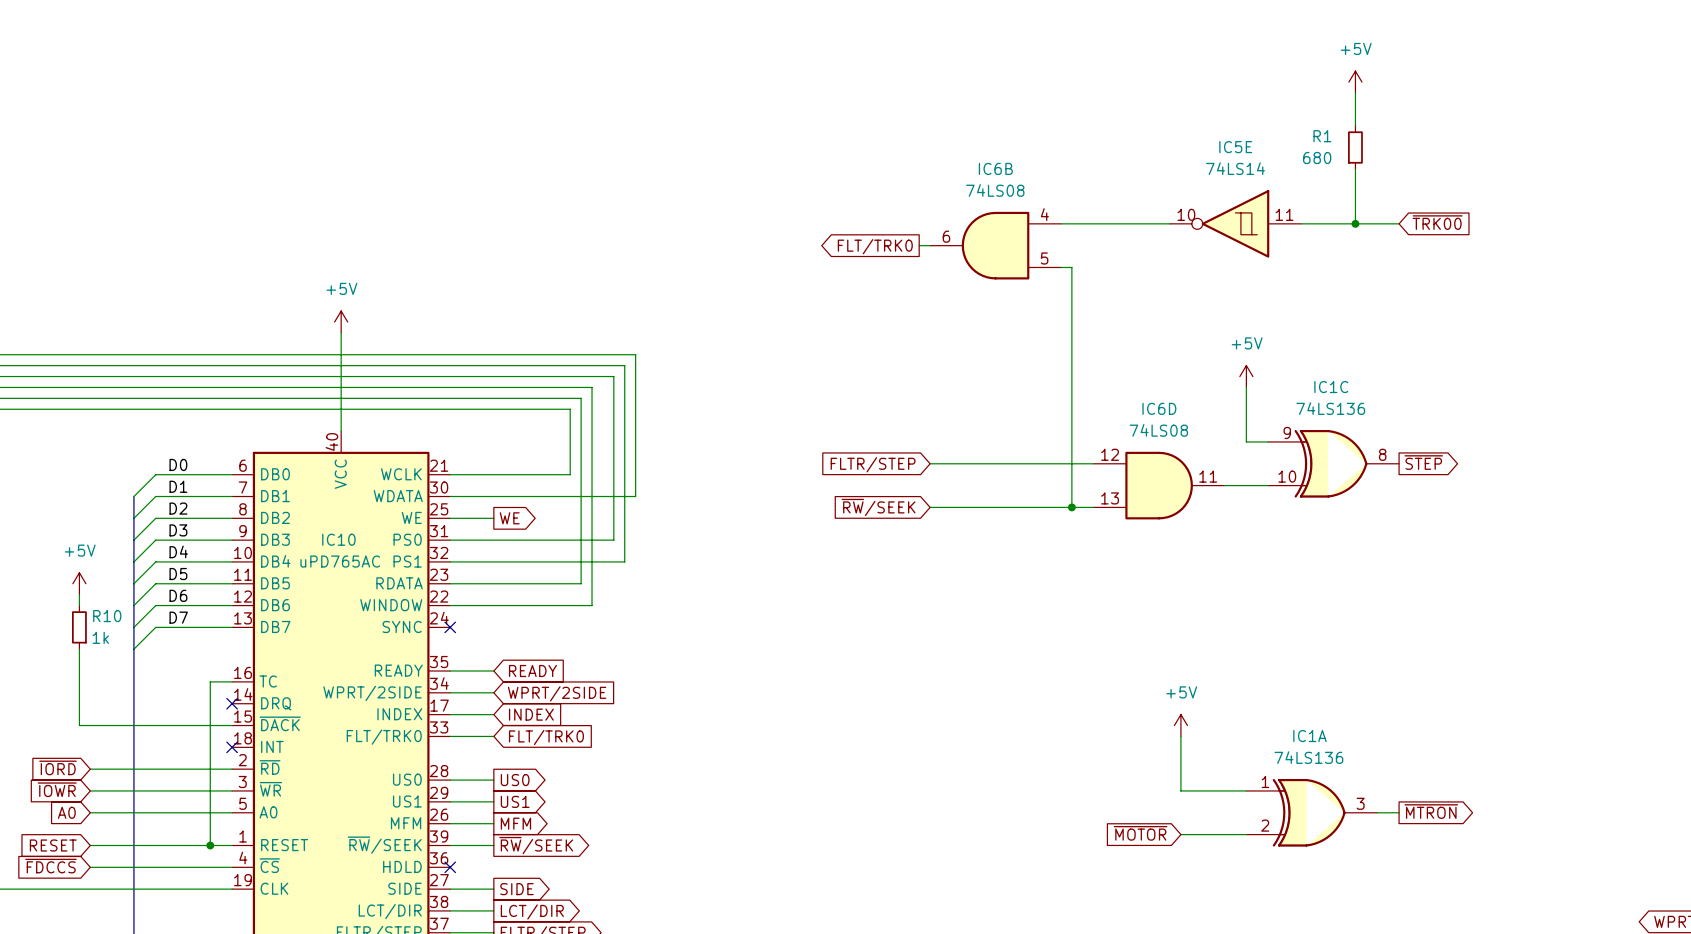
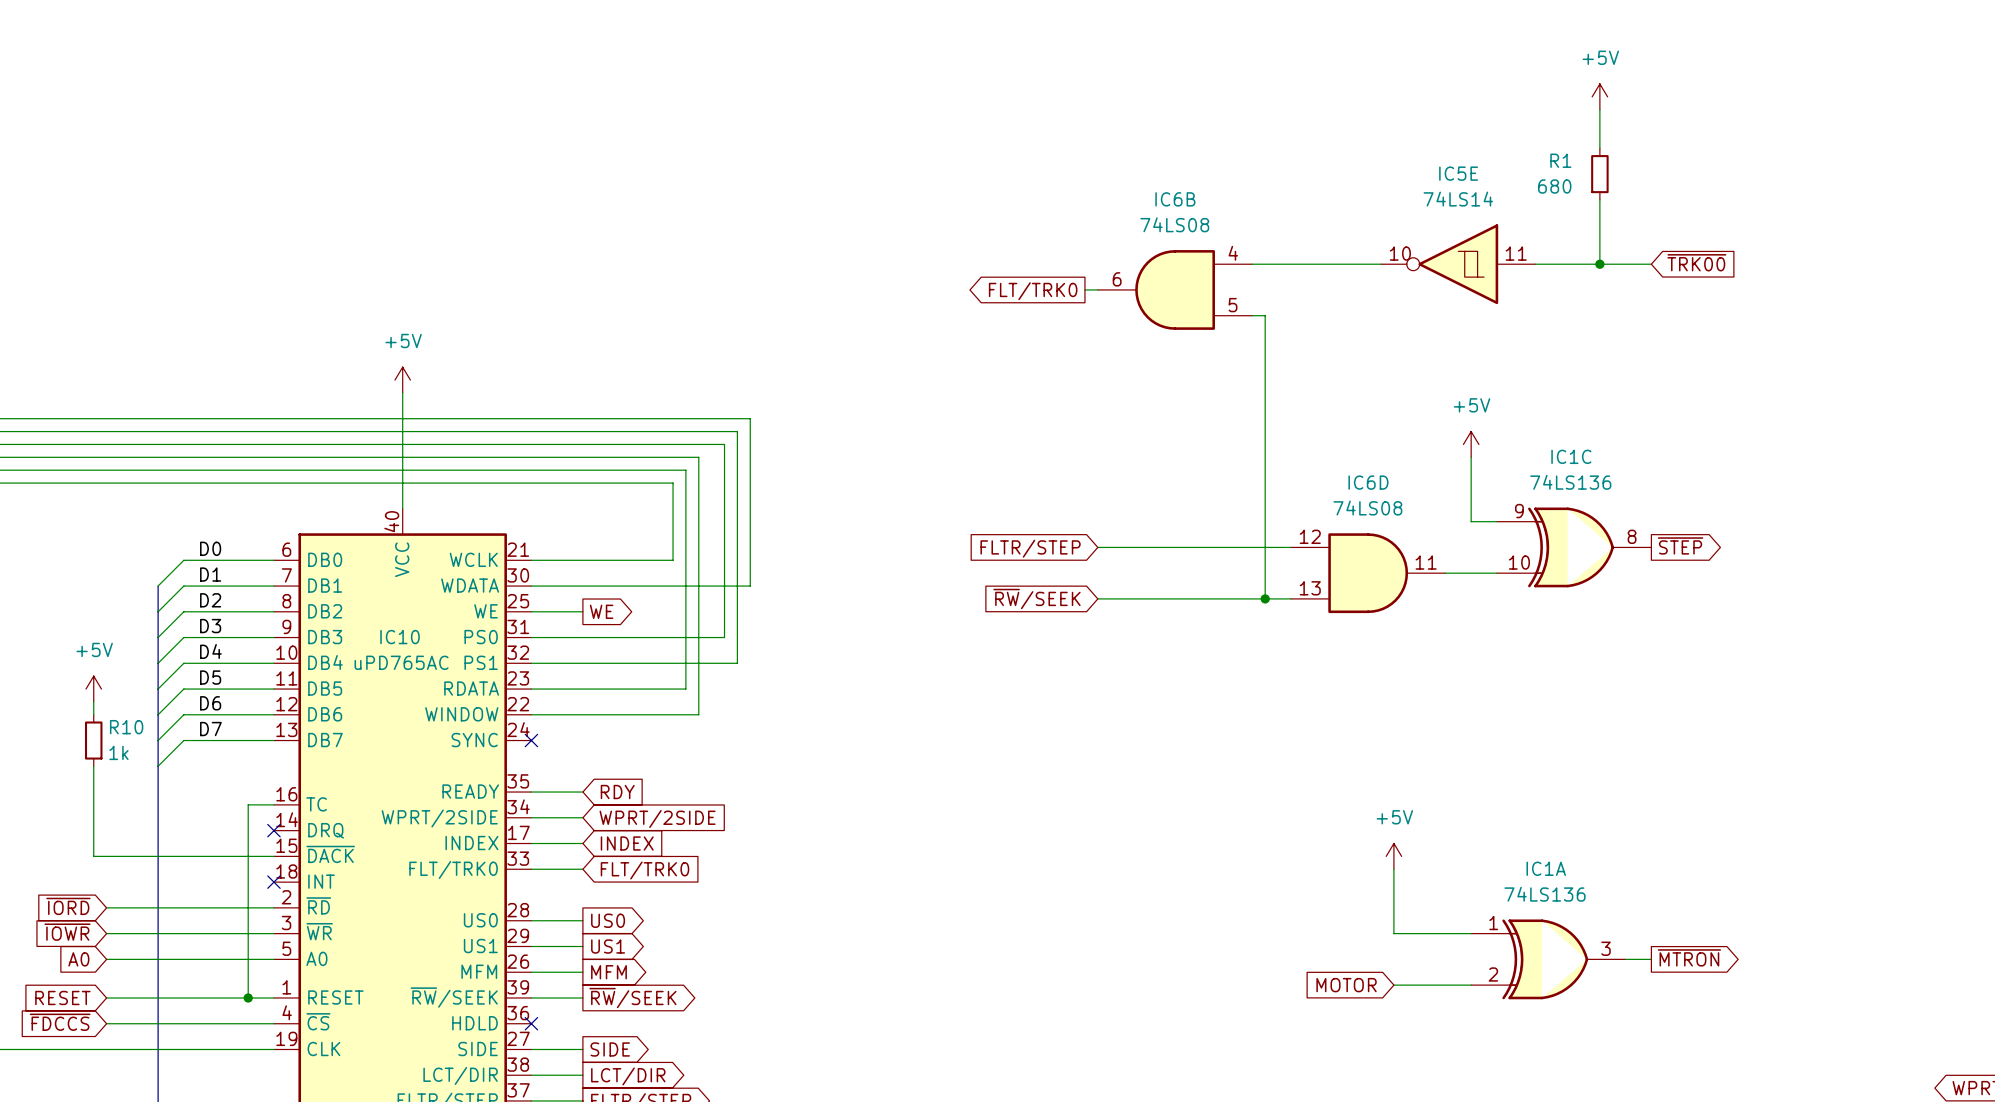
global label: READY (532, 671) -> RDY (617, 792)
global label: ~{MOTOR} (1140, 833) -> MOTOR (1346, 985)

